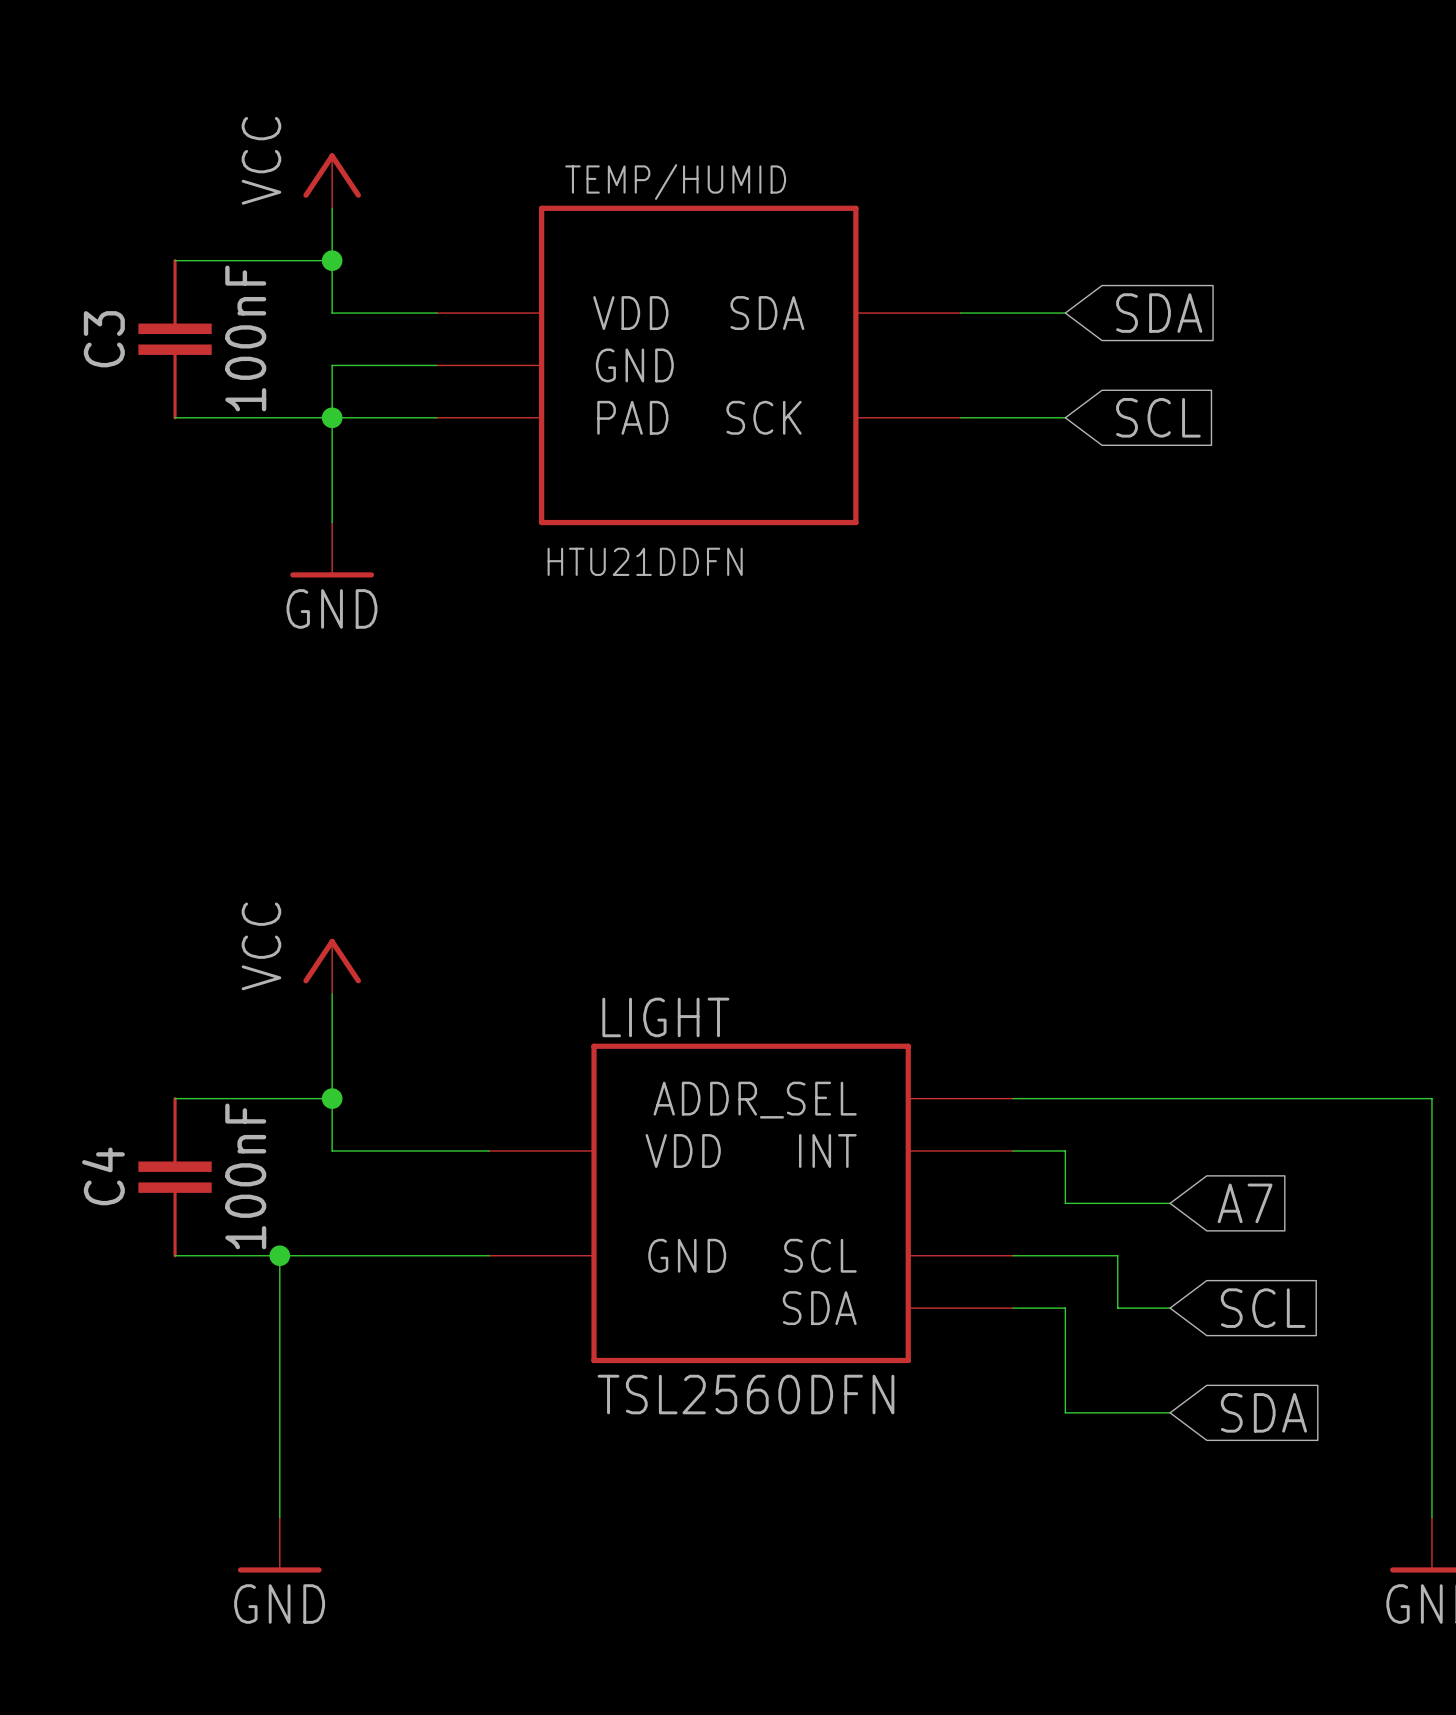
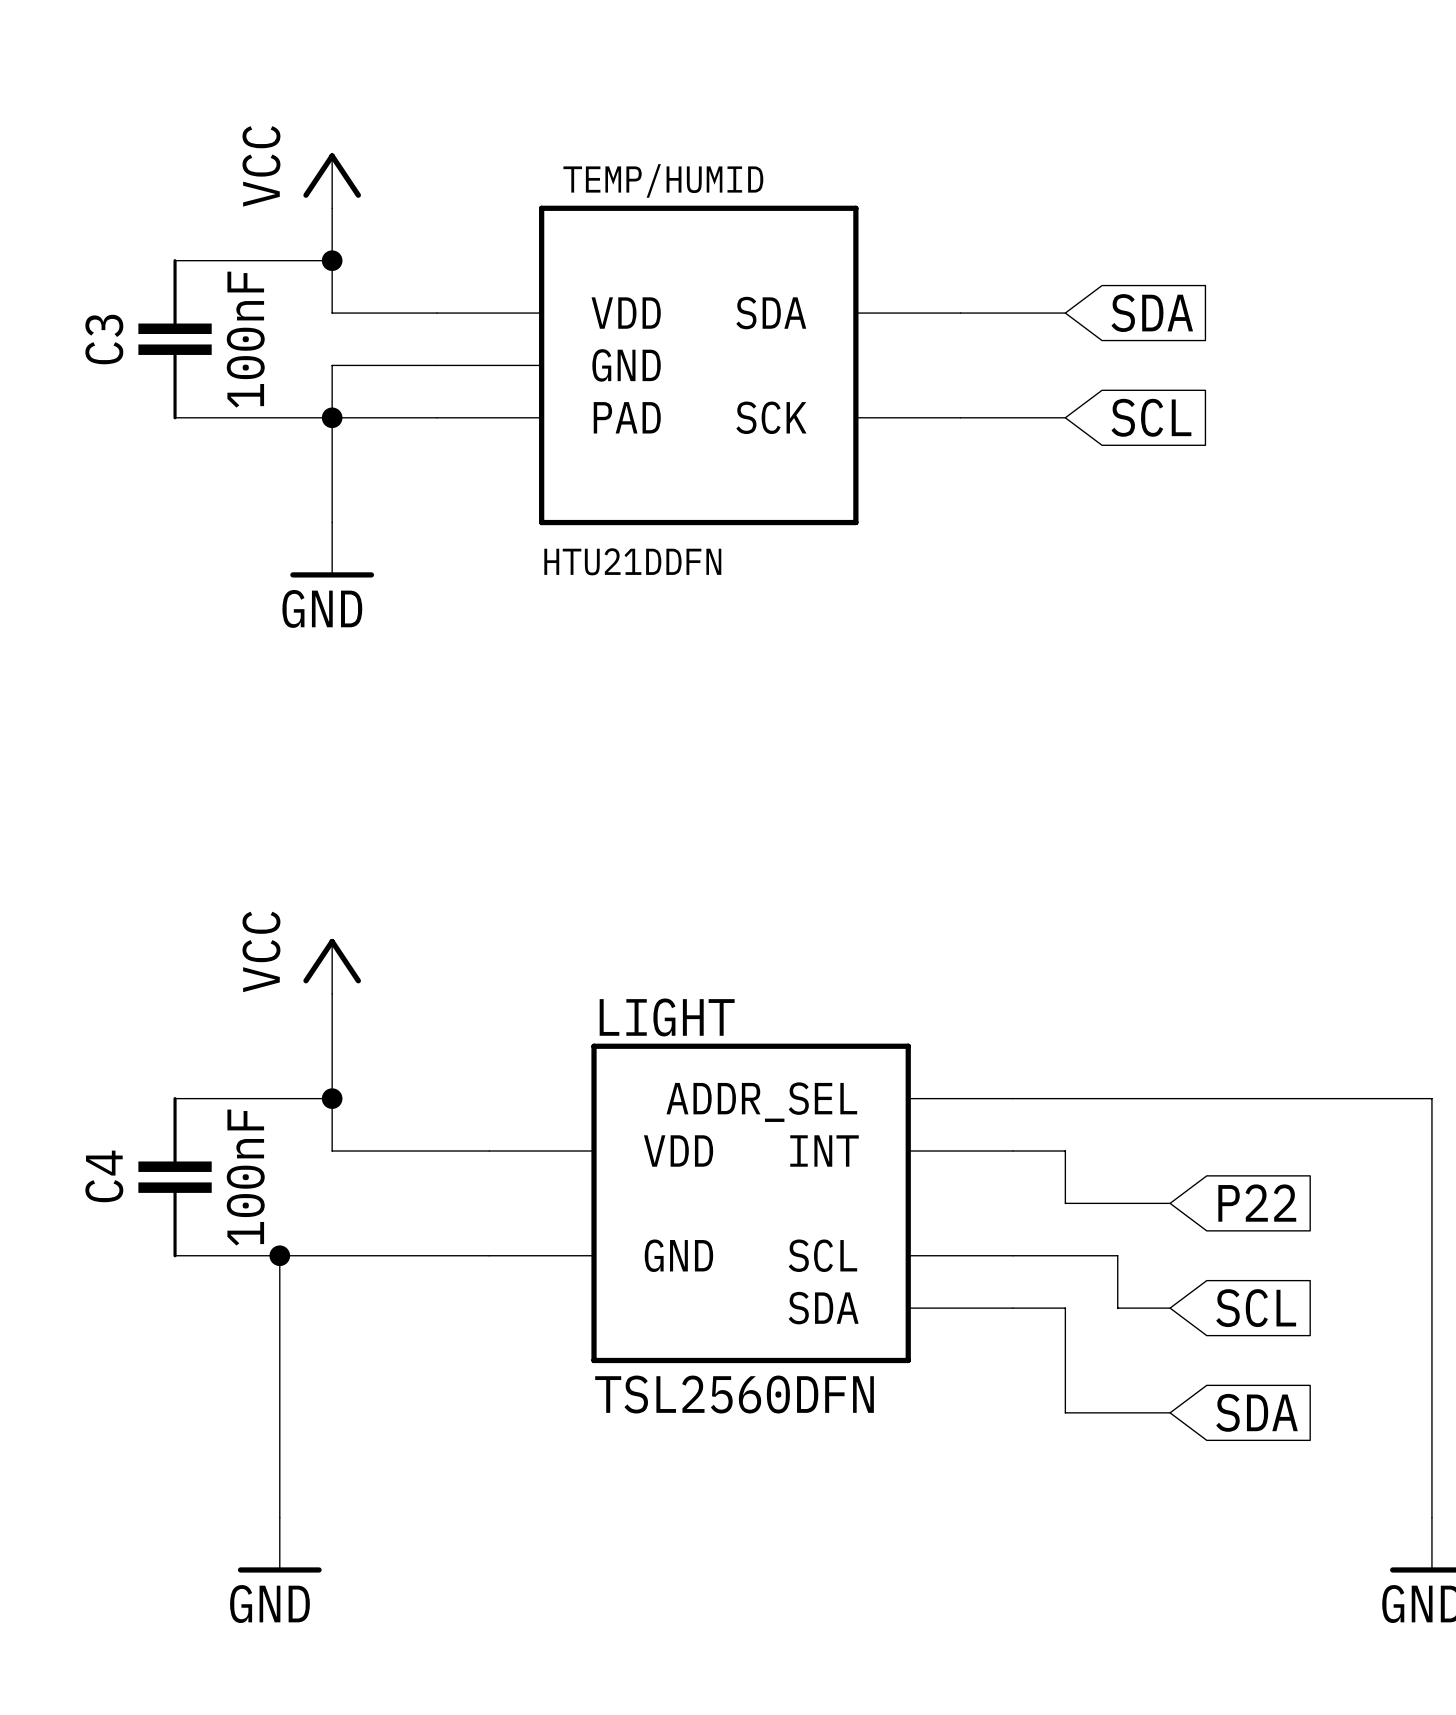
global label: A7 (1245, 1203) -> P22 (1257, 1203)

